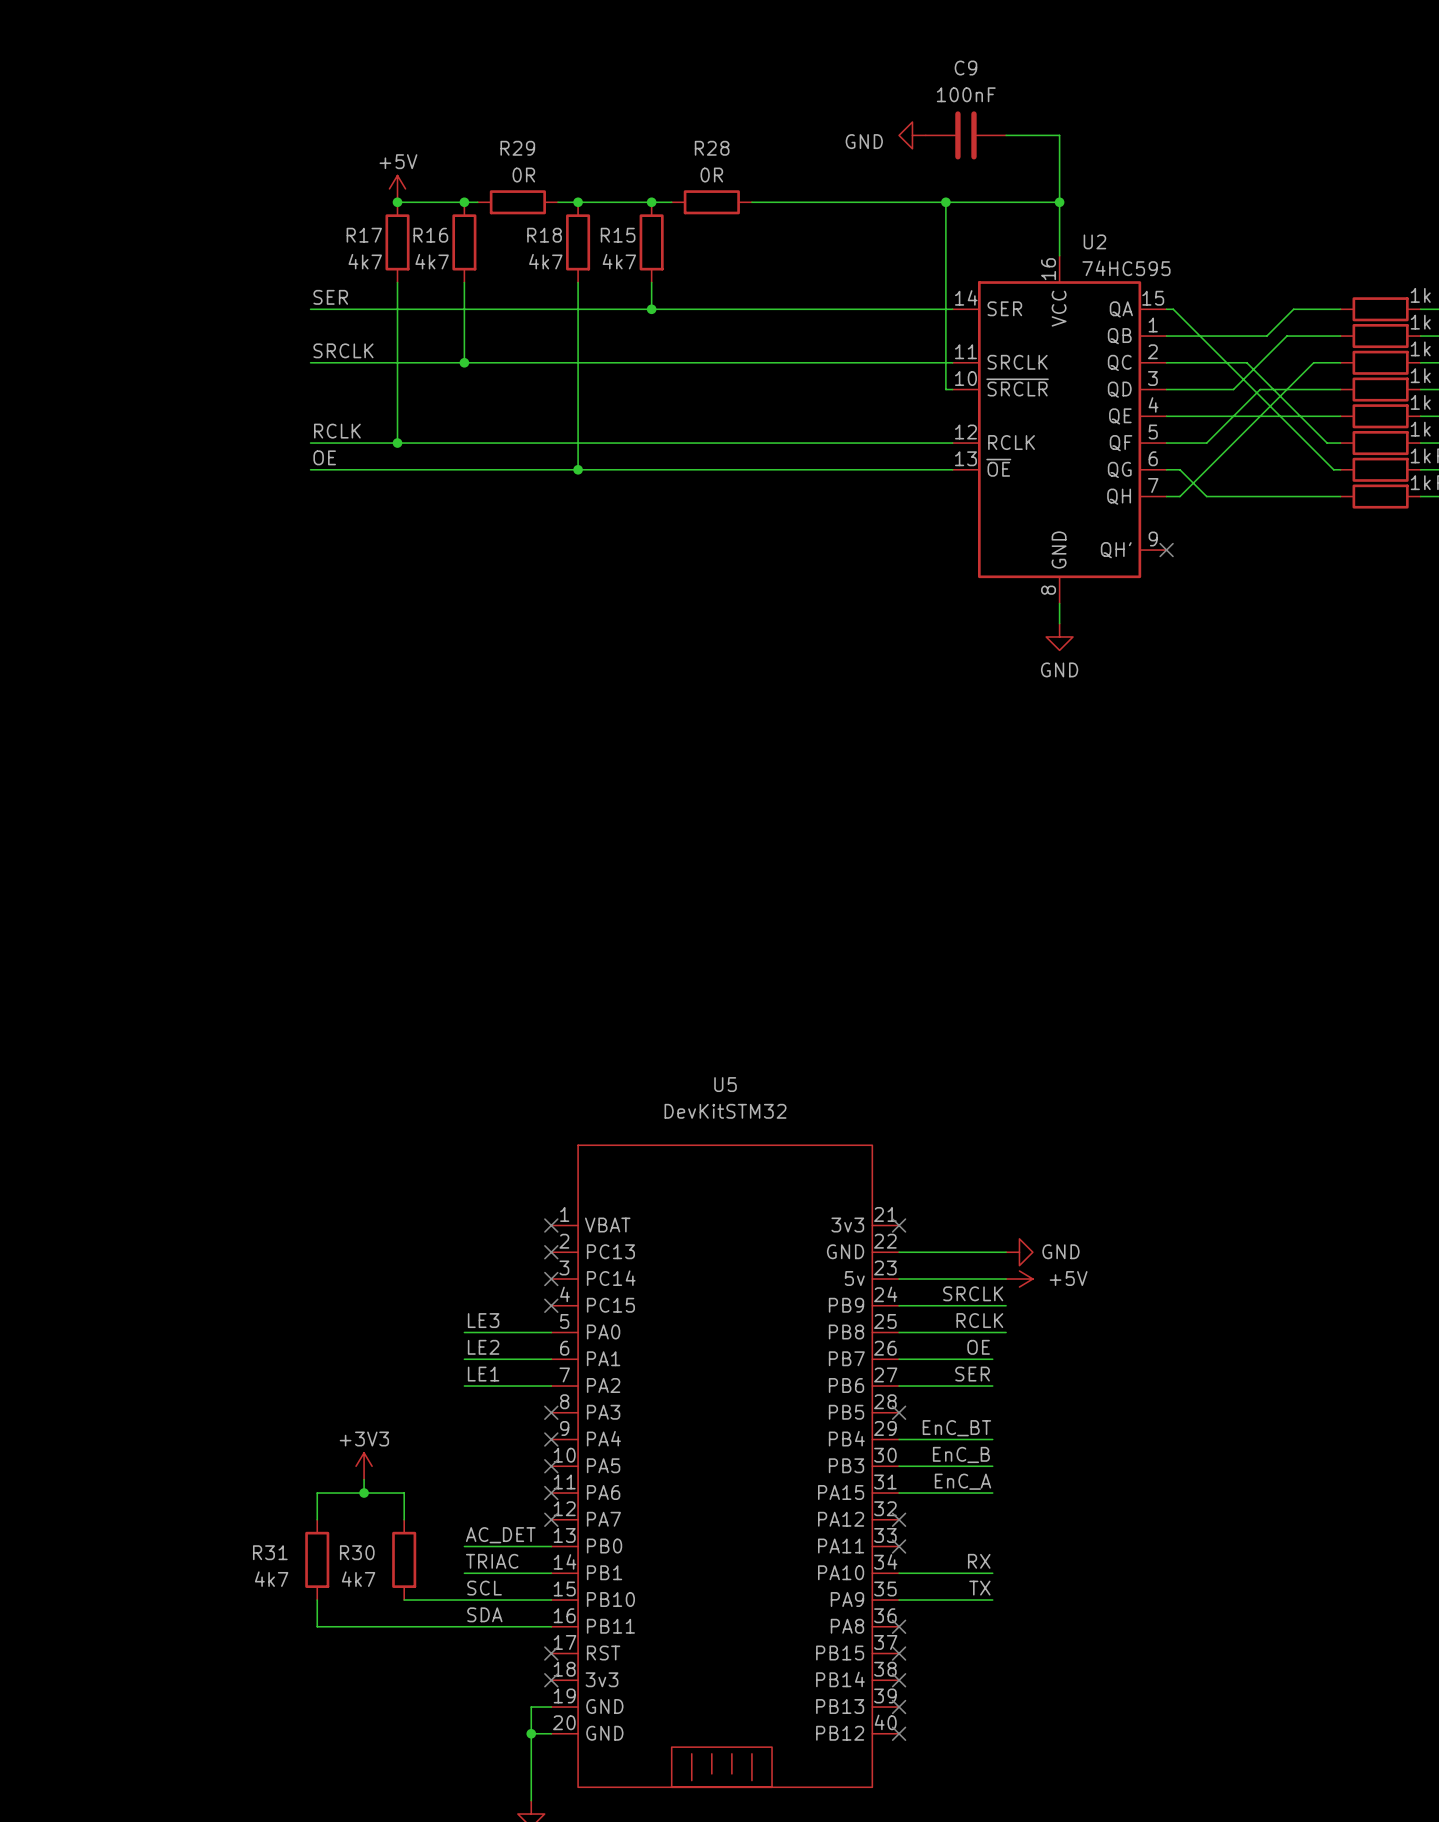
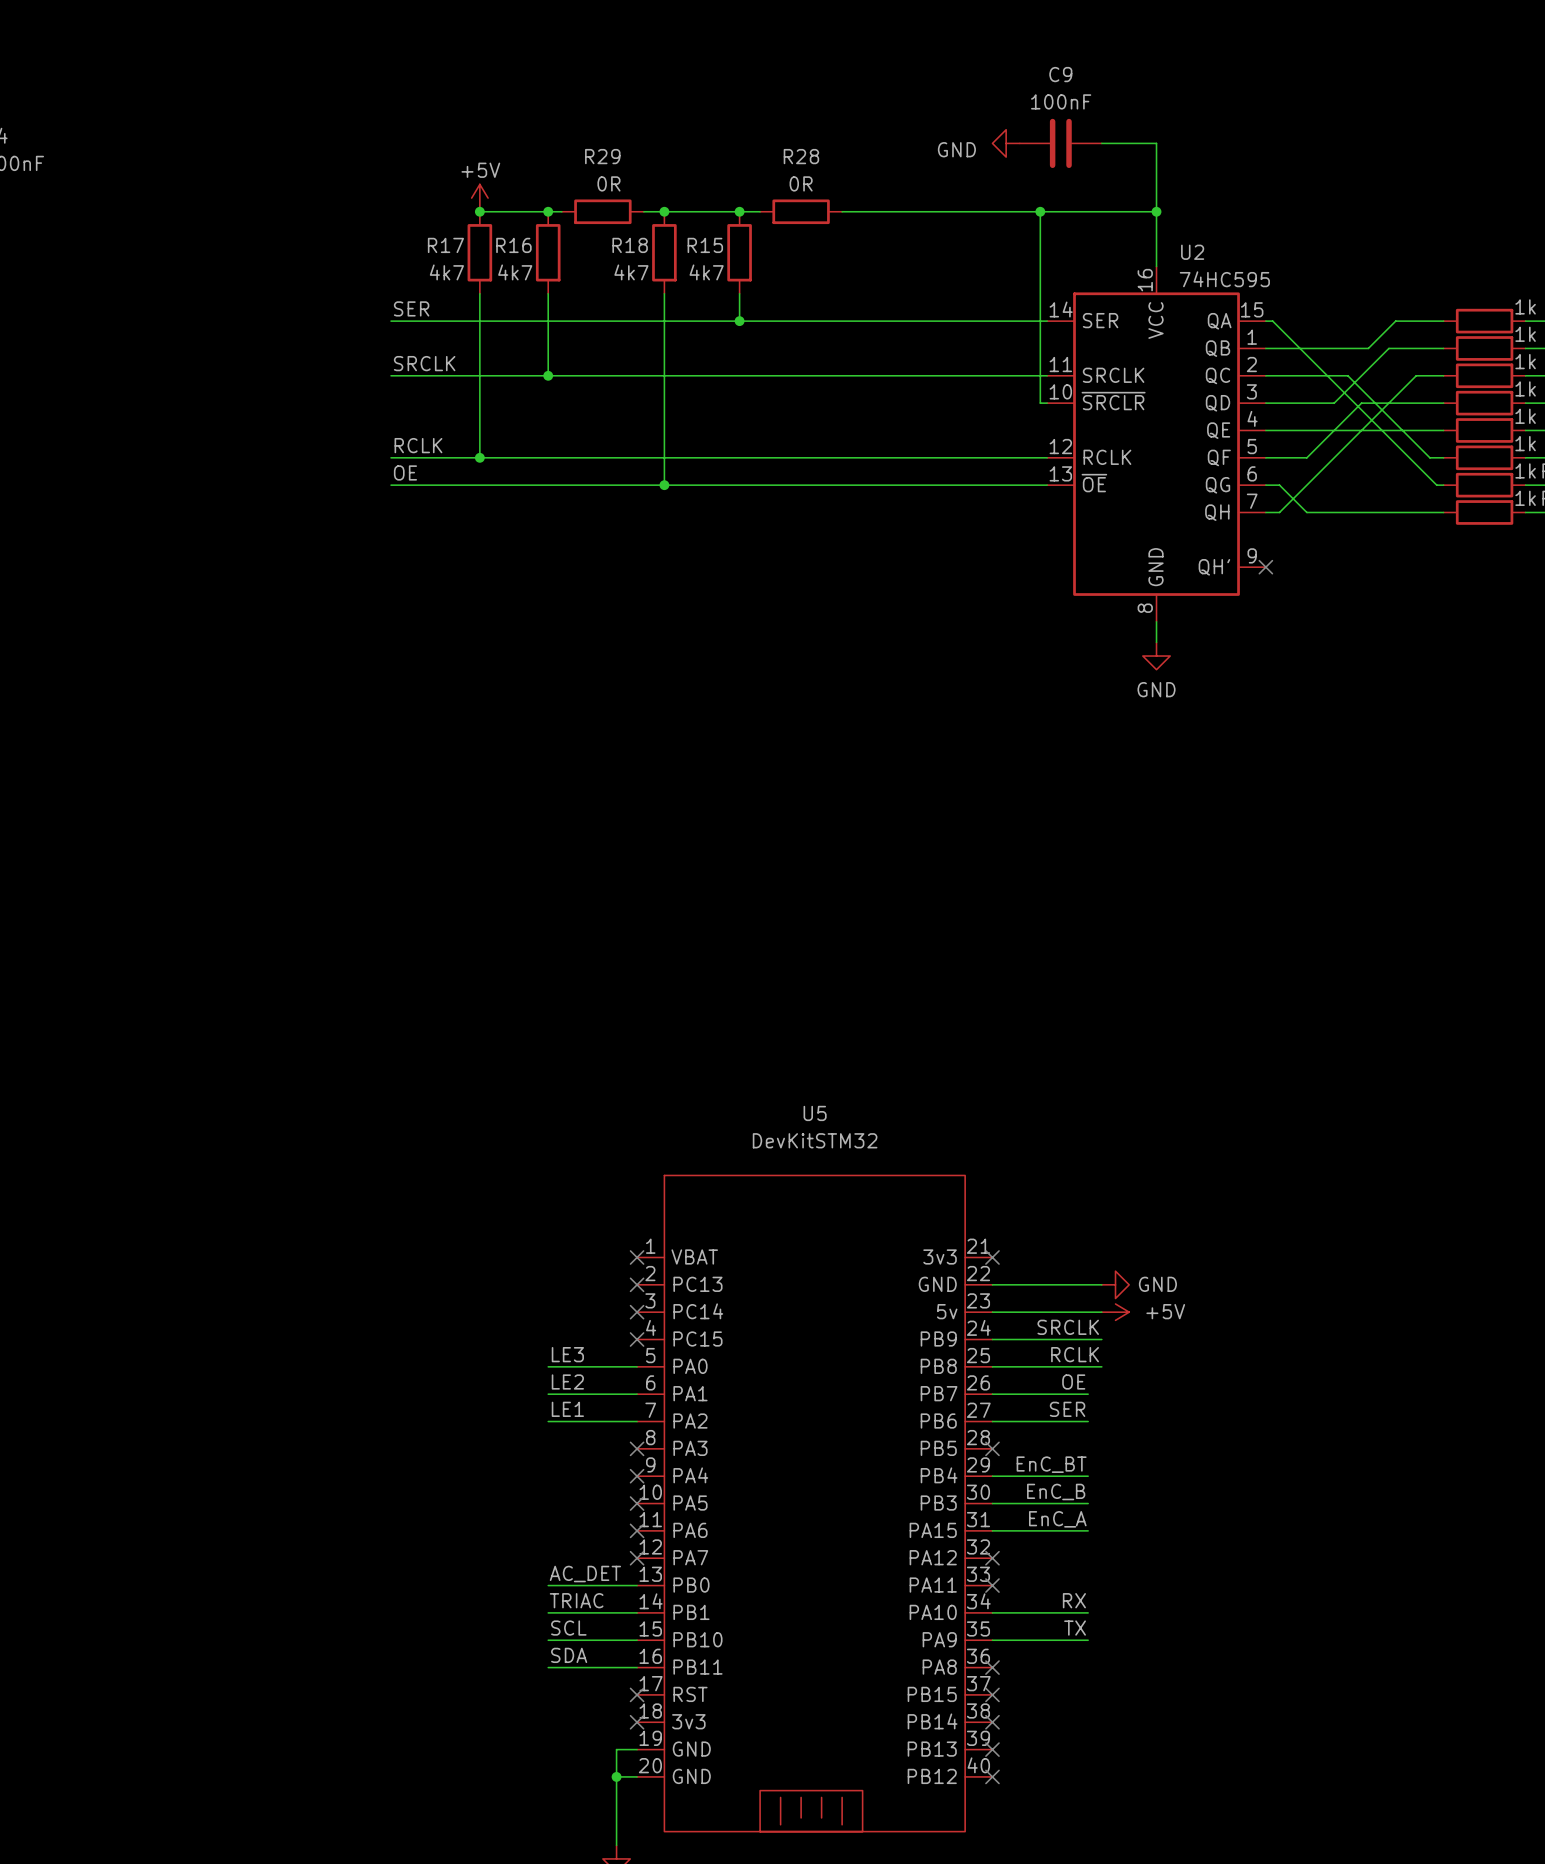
power symbol: +3V3 (364, 1466) -> none
wire: (364, 1479) (364, 1493) -> none
junction: (364, 1493) -> none
wire: (317, 1519) (317, 1493) (404, 1493) (404, 1519) -> none
R31: 4k7 (317, 1559) -> none
R30: 4k7 (404, 1559) -> none
wire: (317, 1600) (317, 1626) (464, 1626) -> none
wire: (404, 1600) (464, 1600) -> none

